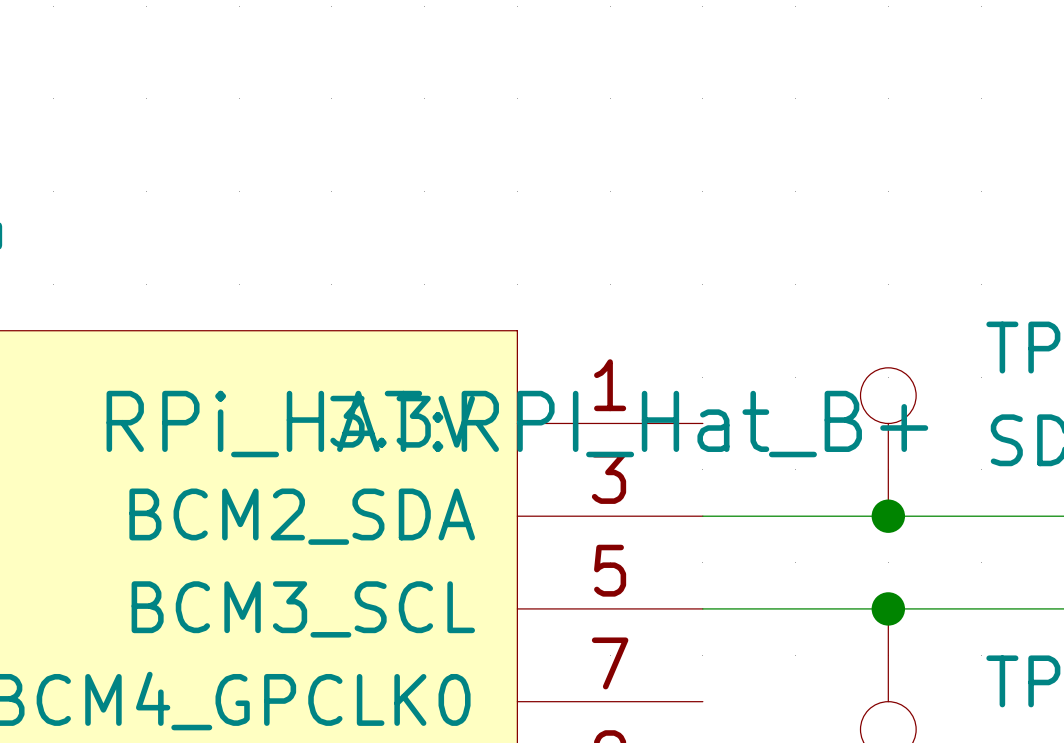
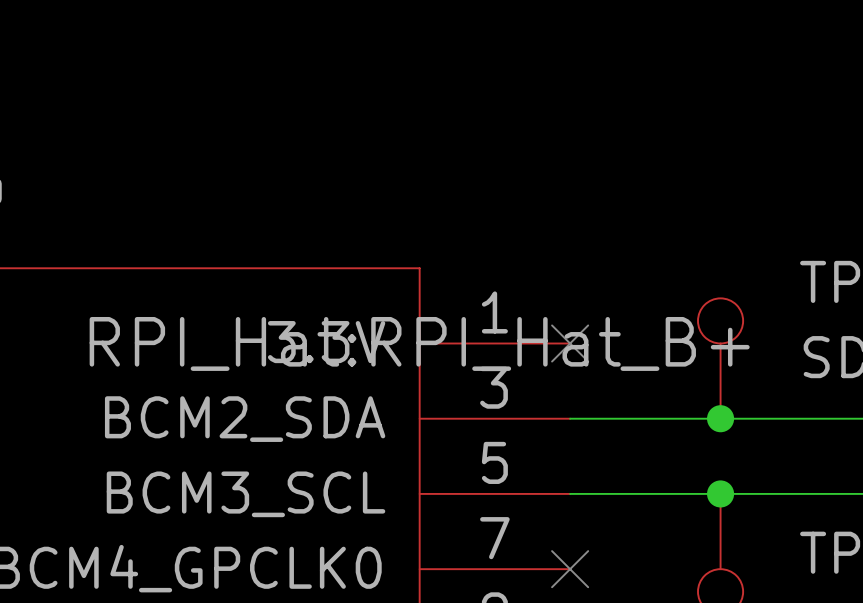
no-connect mark: none -> (570, 343)
part text: RPi_HAT:RPI_Hat_B+ (517, 424) -> RPI_Hat:RPI_Hat_B+ (419, 343)
no-connect mark: none -> (570, 569)

